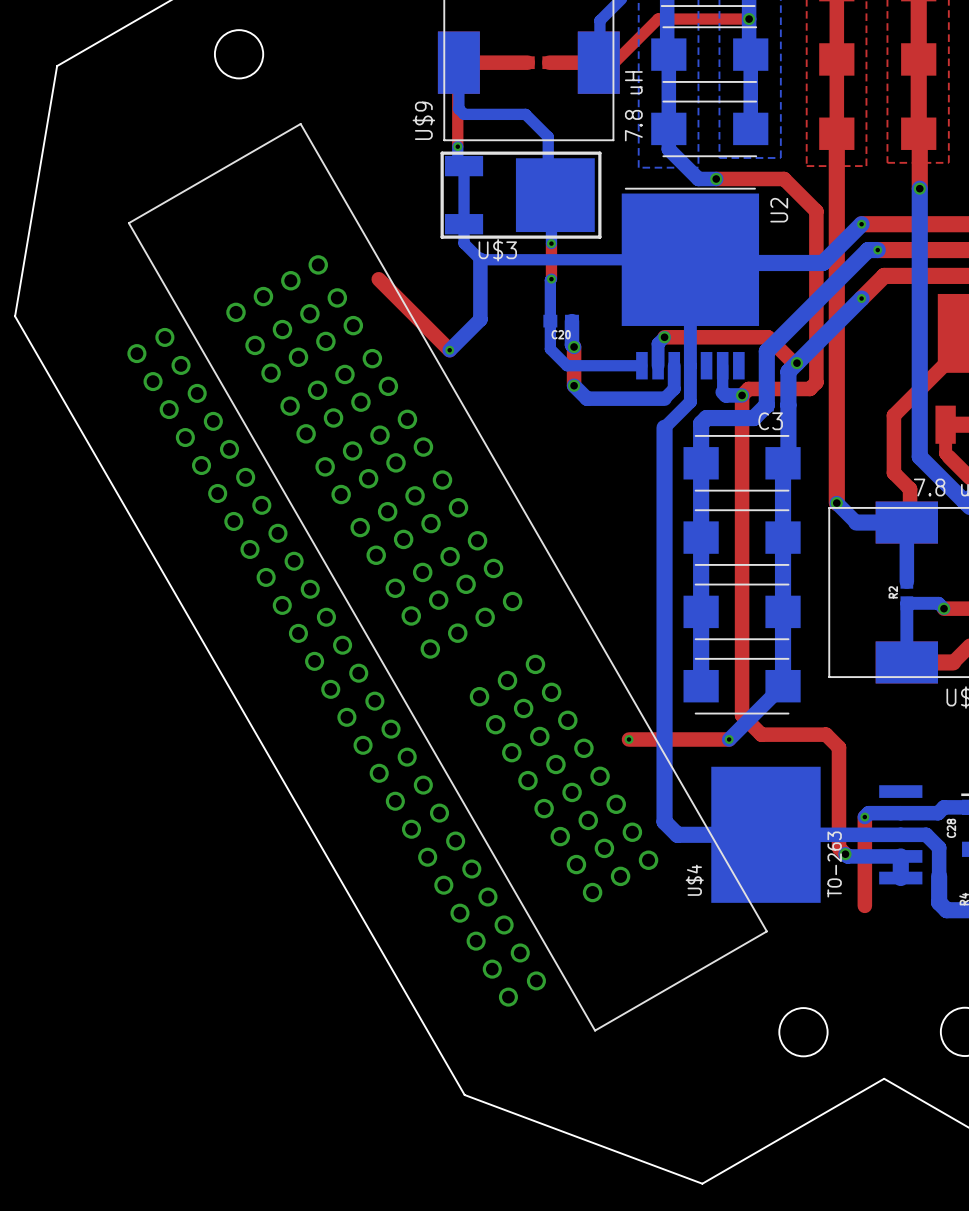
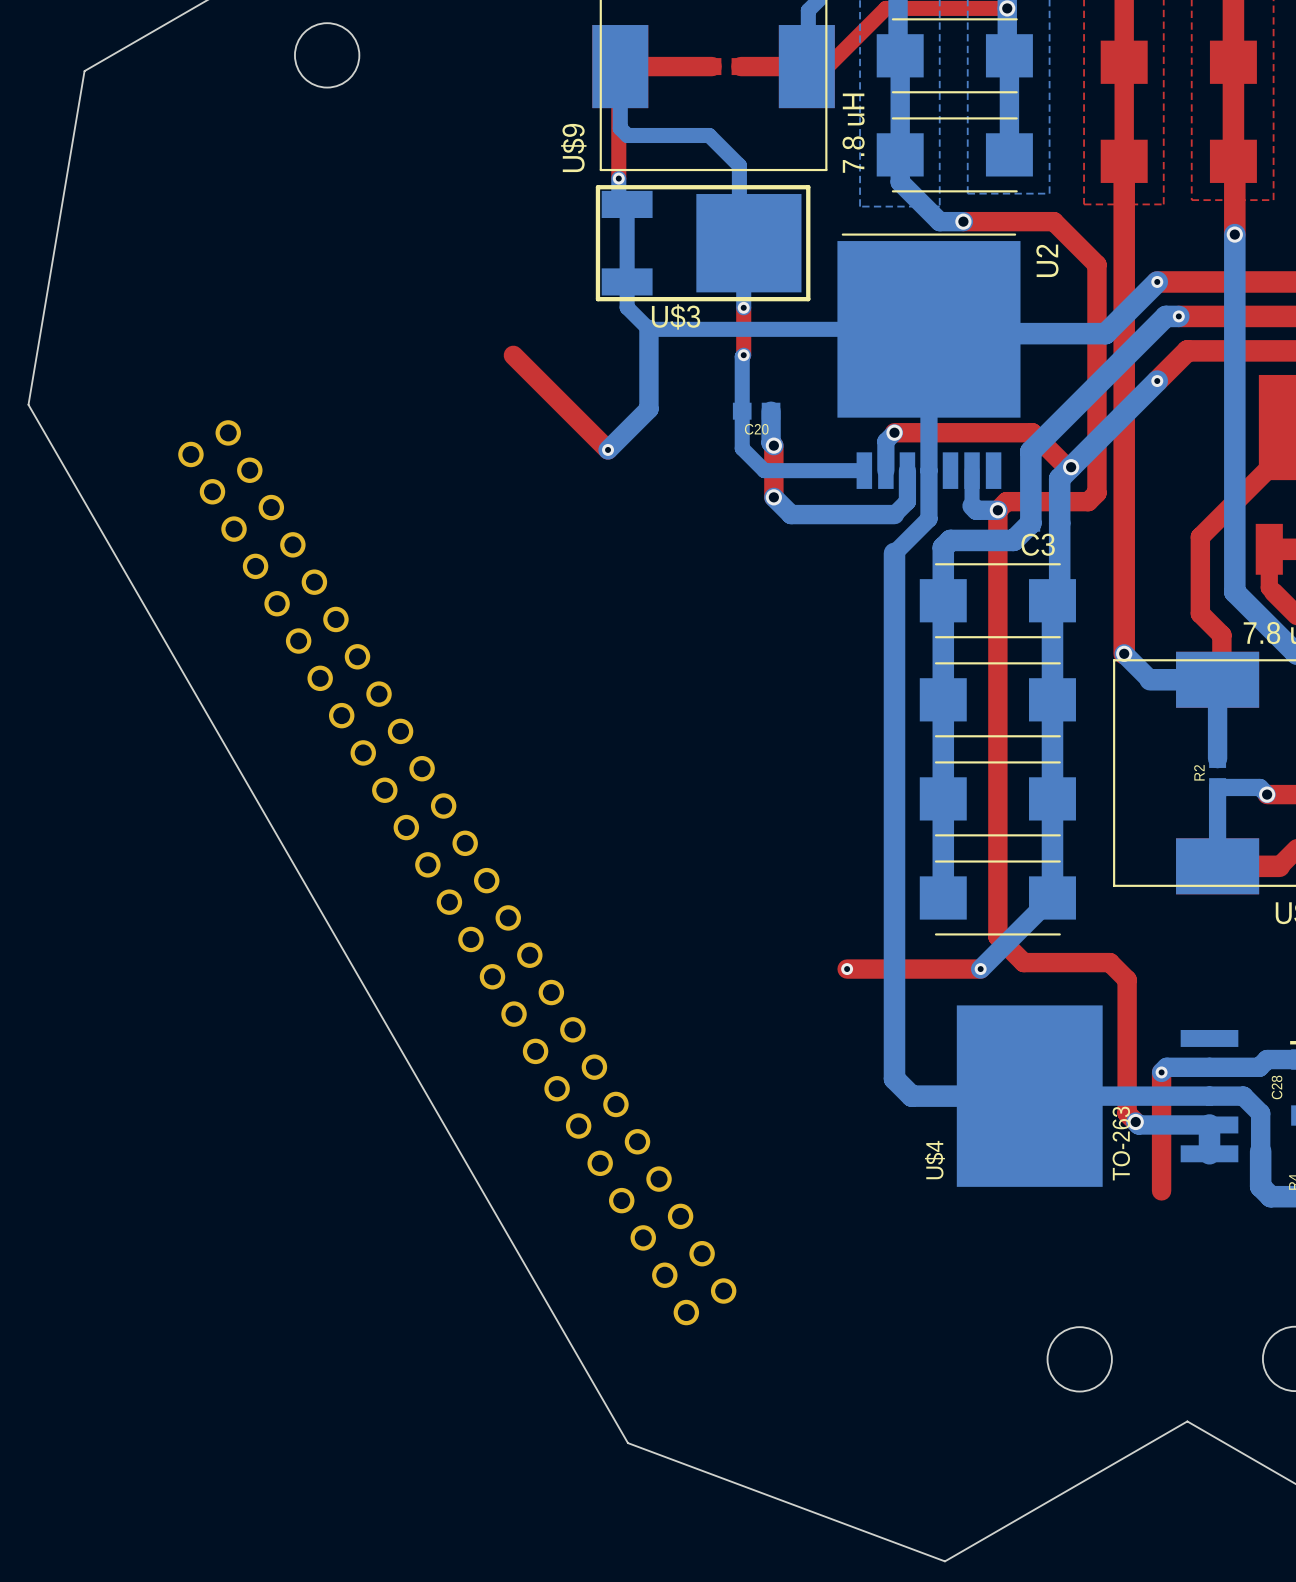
part: (447, 577) -> none

